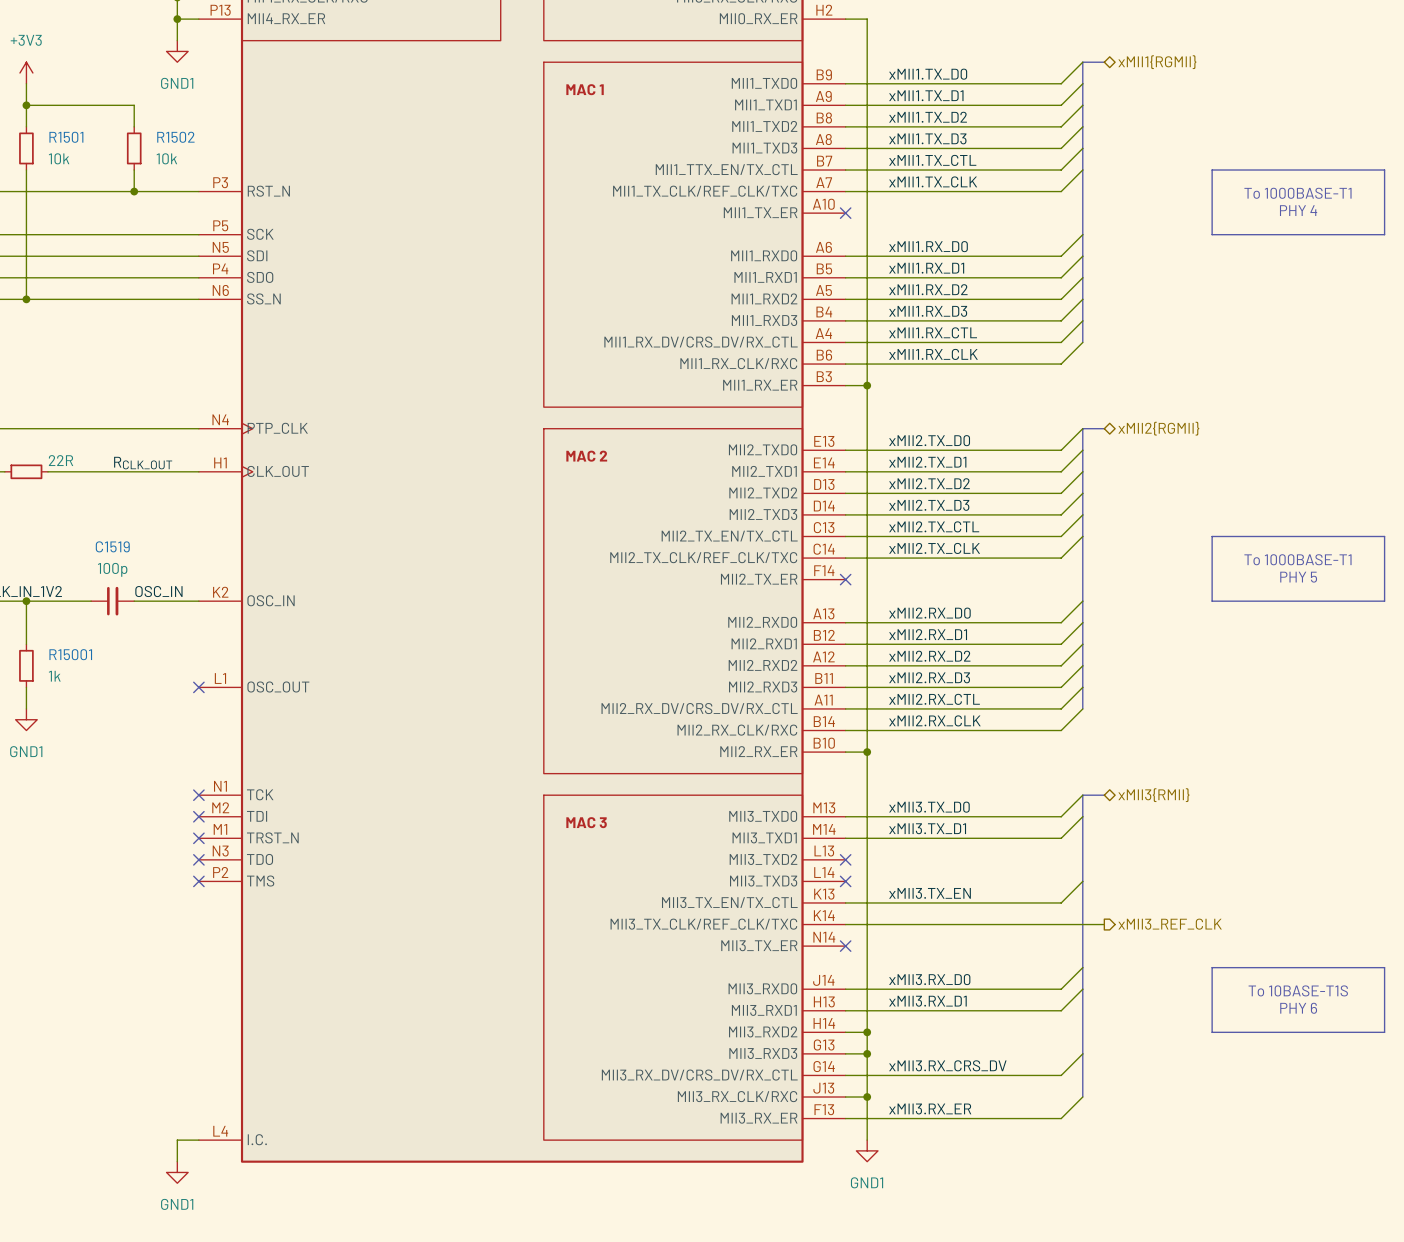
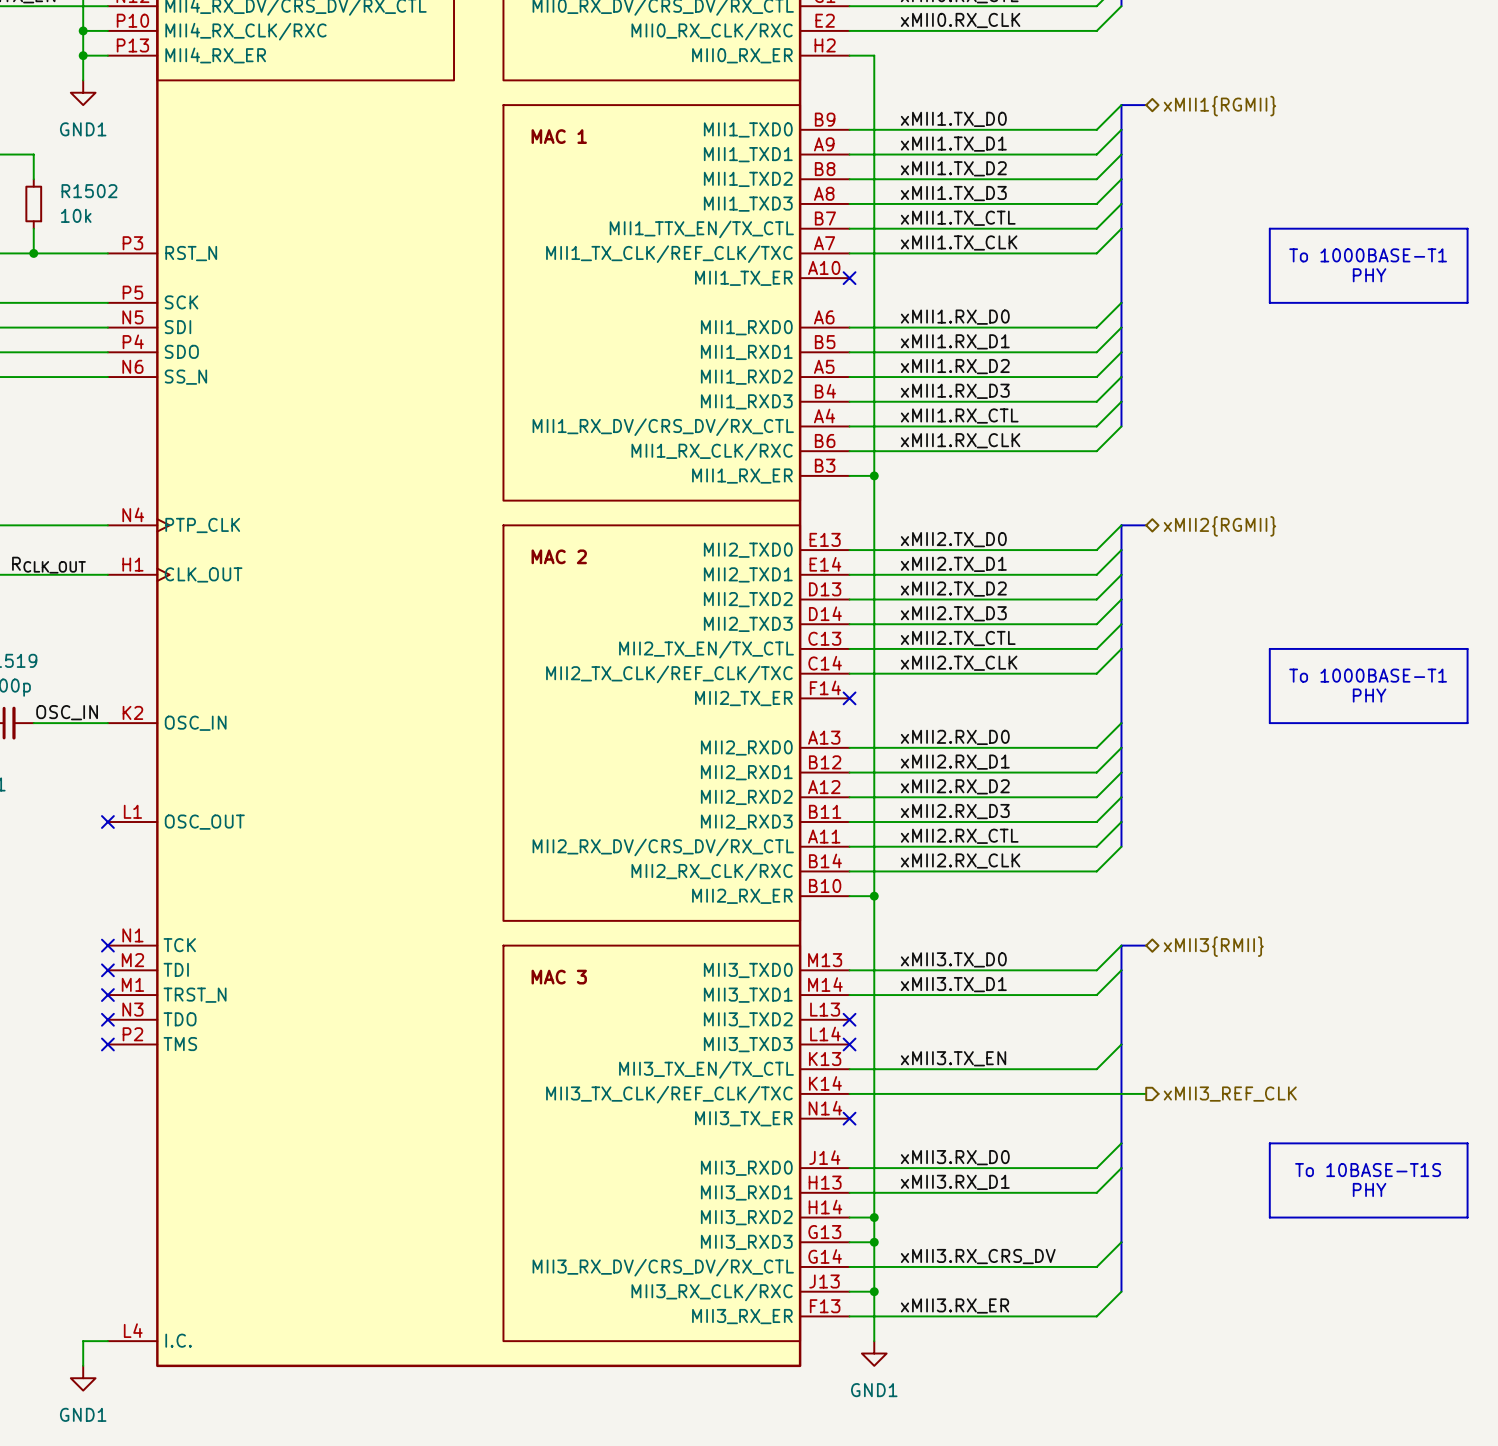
text: PHY 4 (1298, 210) -> PHY (1369, 275)
text: PHY 5 (1298, 577) -> PHY (1369, 695)
text: PHY 6 (1298, 1008) -> PHY (1369, 1189)

